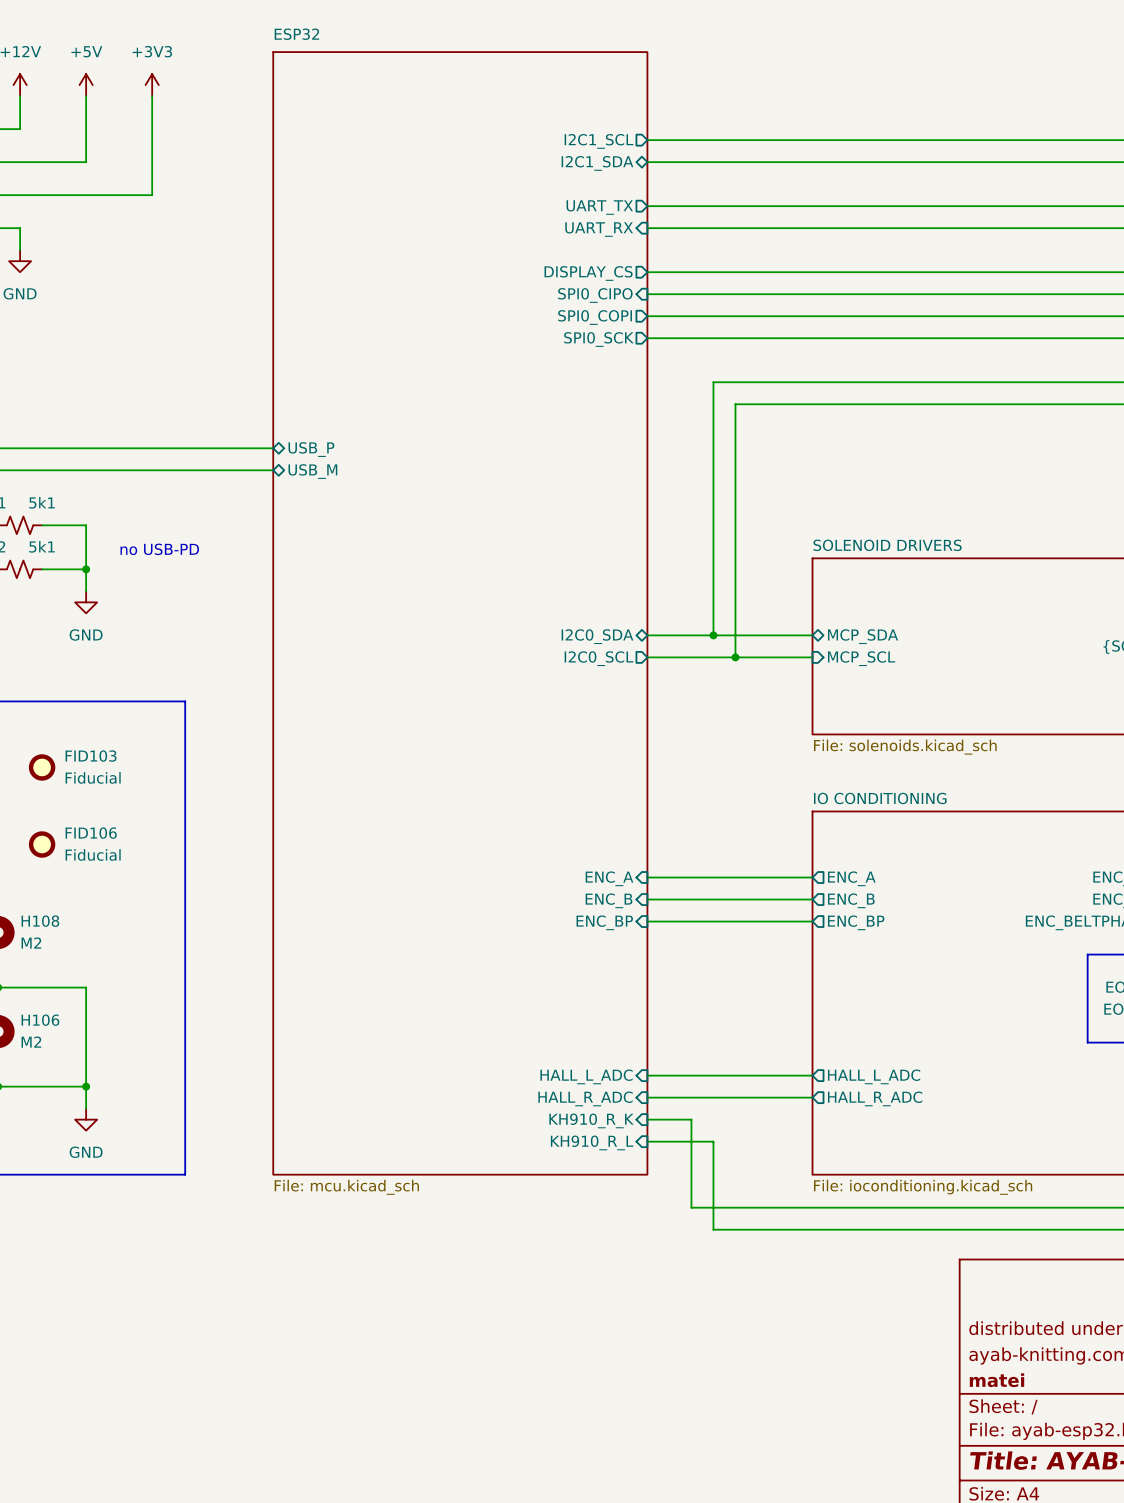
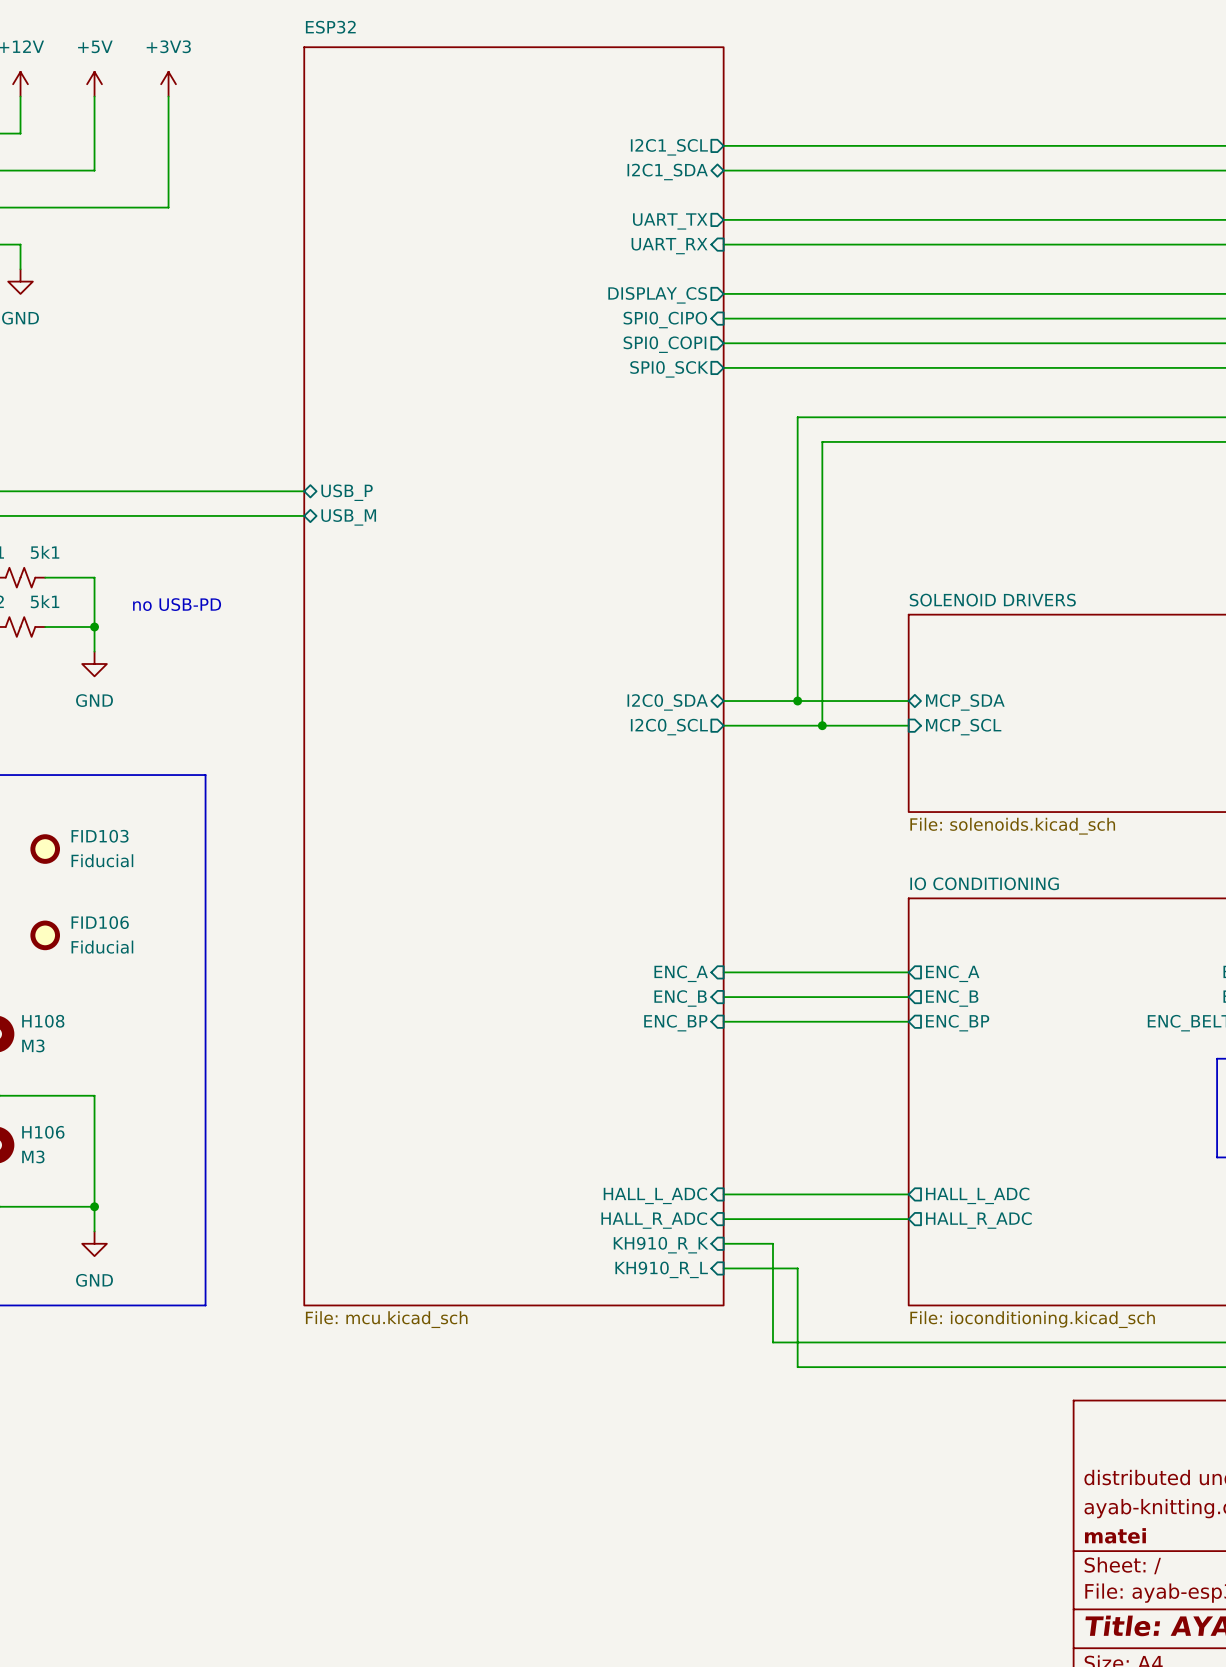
H108 value: M2 (31, 943) -> M3 (33, 1045)
H106 value: M2 (31, 1042) -> M3 (33, 1156)

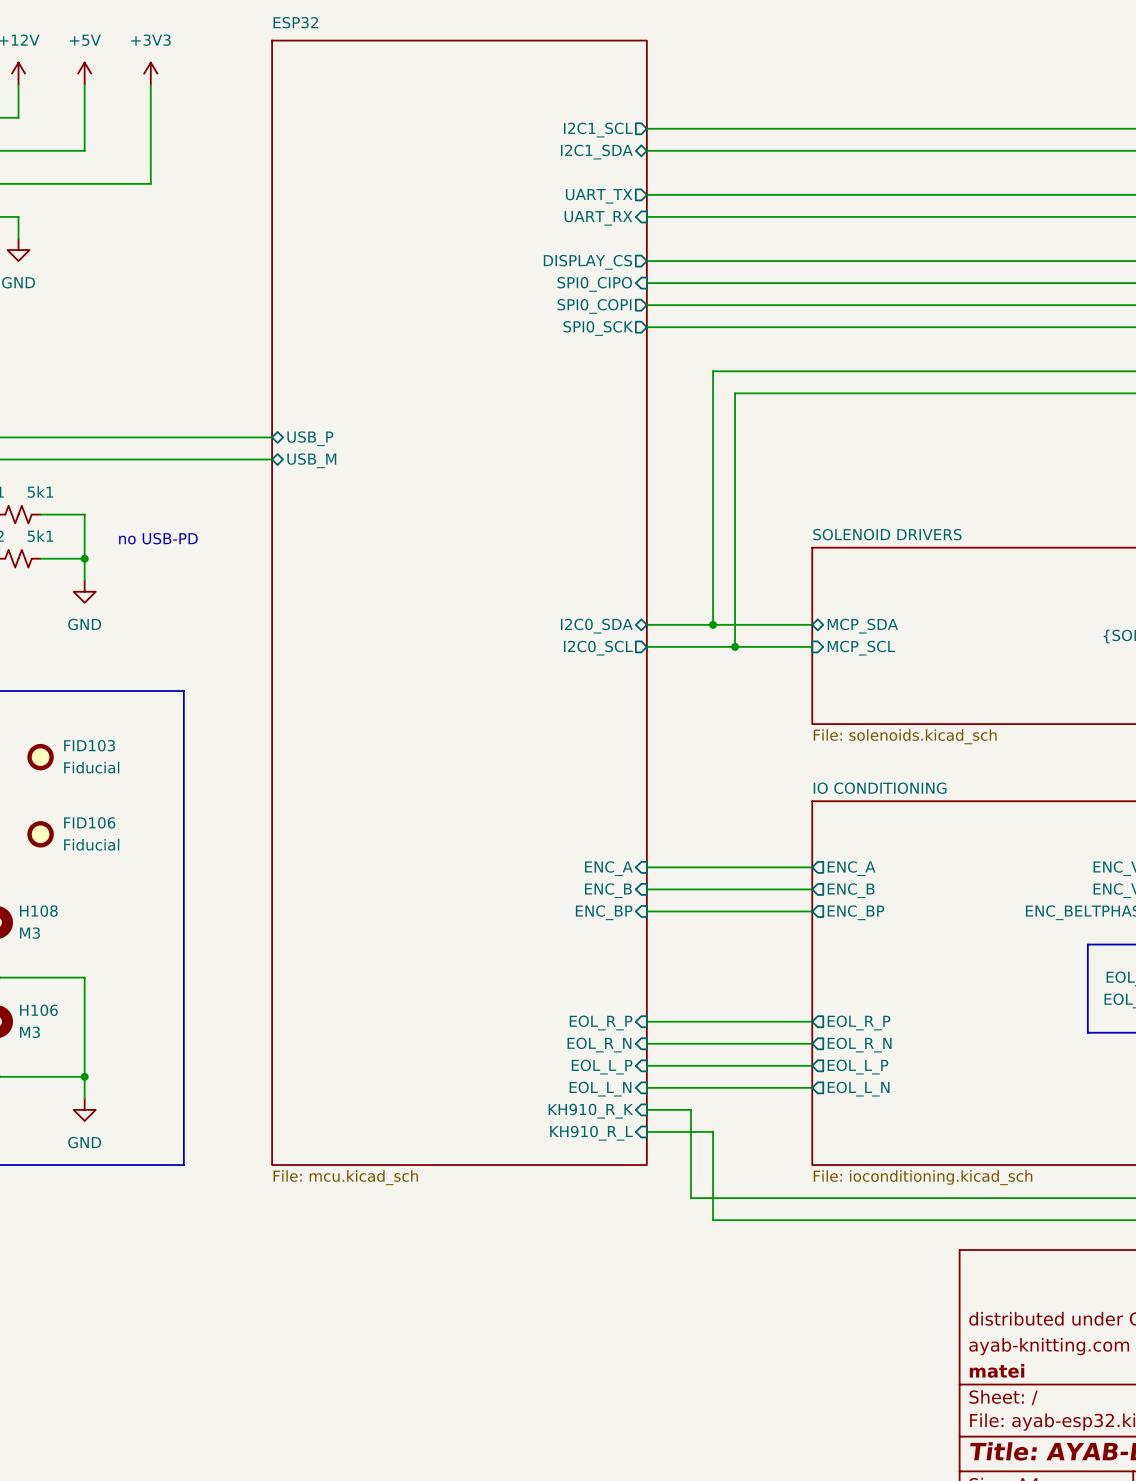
wire: none -> (646, 1021) (812, 1021)
sheet pin: none -> EOL_R_P (601, 1022)
sheet pin: none -> EOL_R_P (859, 1022)
wire: none -> (646, 1043) (812, 1043)
sheet pin: none -> EOL_R_N (599, 1045)
sheet pin: none -> EOL_R_N (859, 1045)
sheet pin: HALL_L_ADC (655, 1195) -> EOL_L_P (602, 1067)
sheet pin: HALL_L_ADC (977, 1195) -> EOL_L_P (858, 1067)
sheet pin: HALL_R_ADC (654, 1220) -> EOL_L_N (600, 1089)
sheet pin: HALL_R_ADC (978, 1220) -> EOL_L_N (858, 1089)

